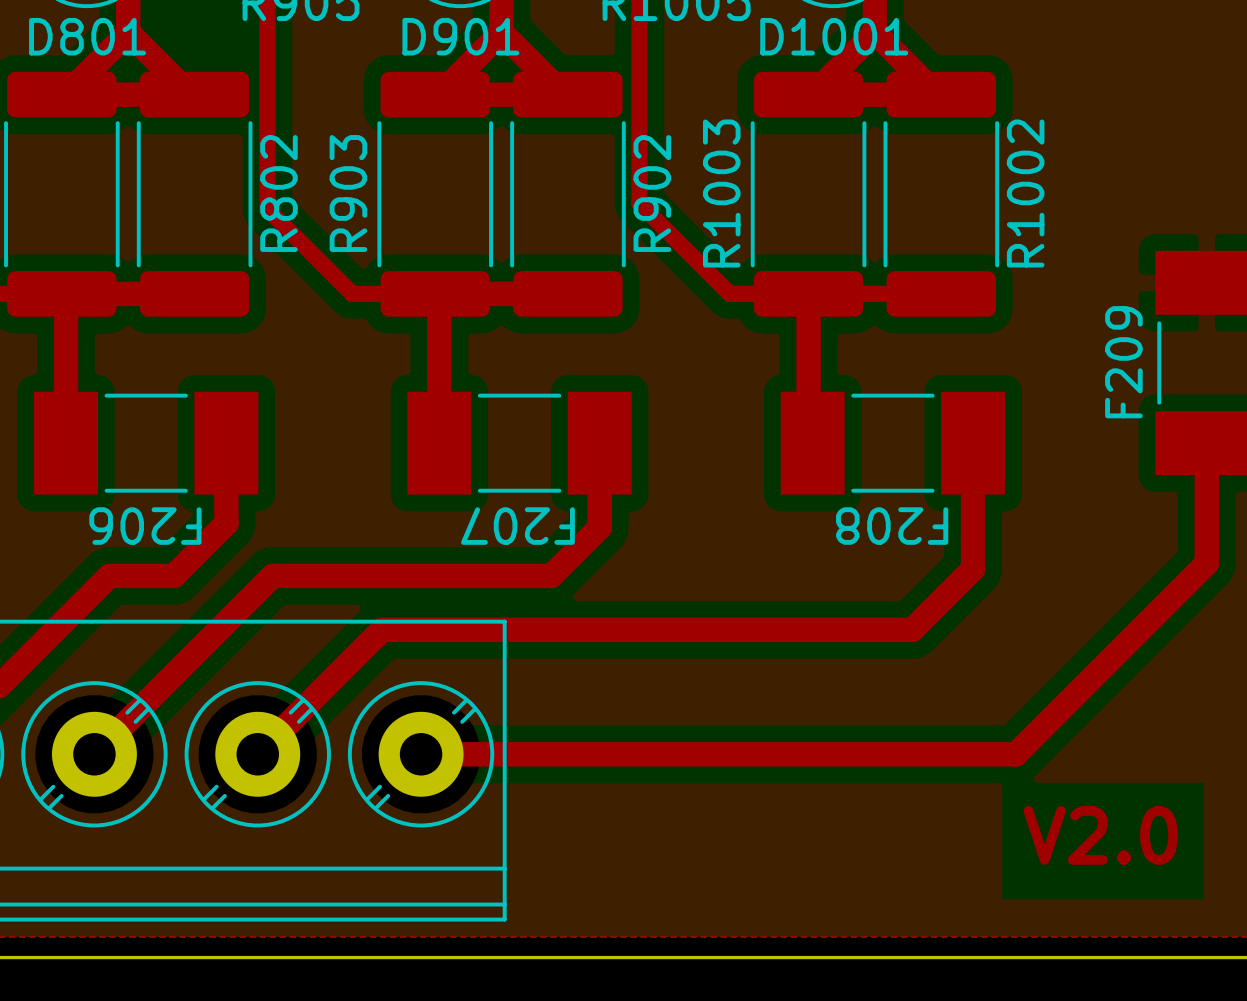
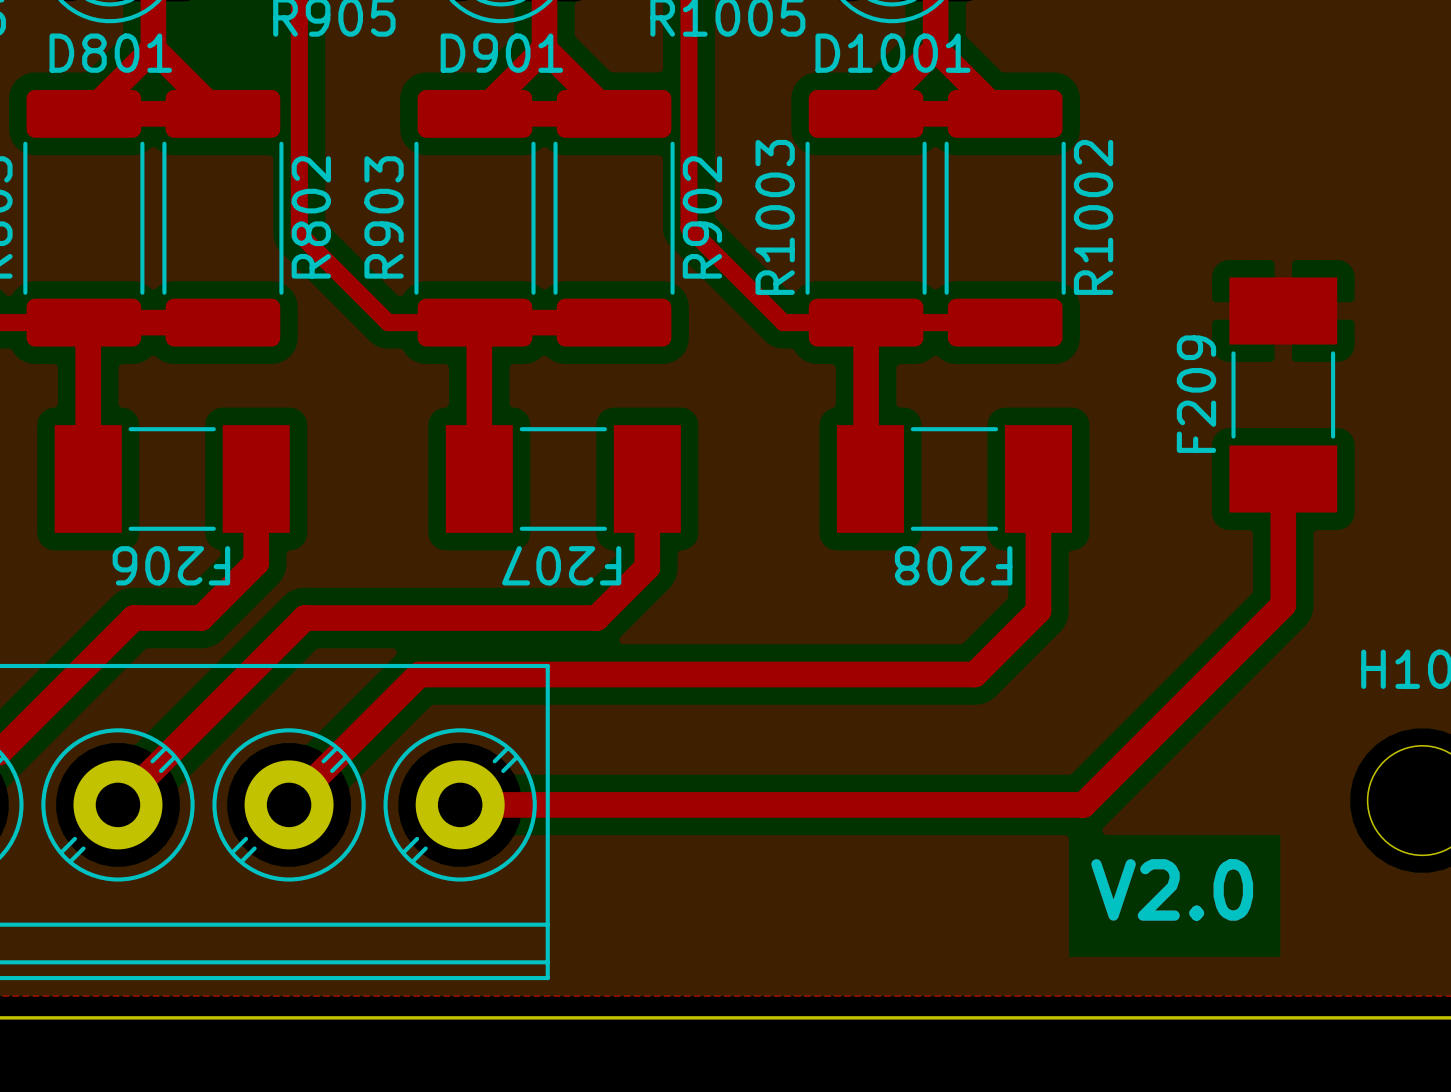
text: none -> V2.0 (1172, 889)

